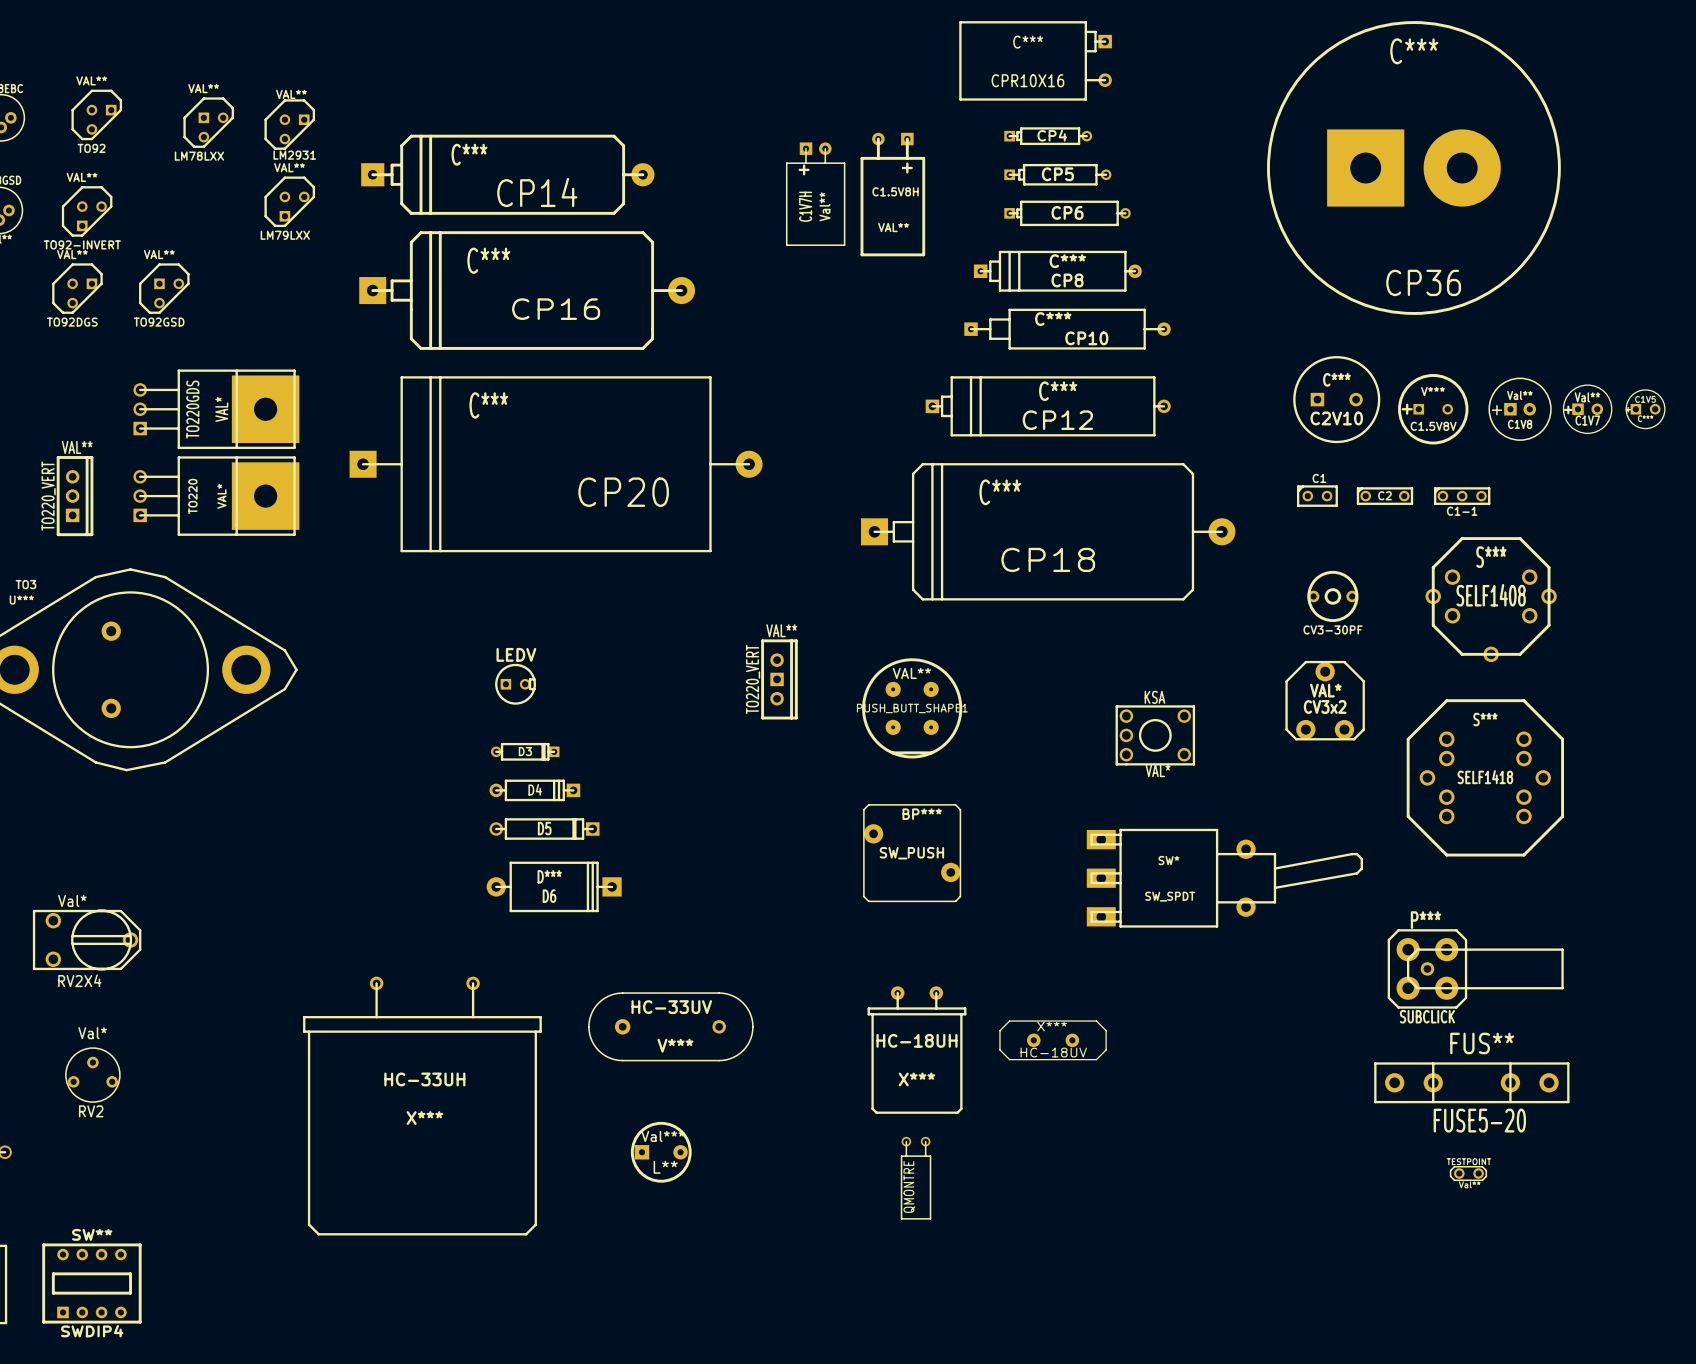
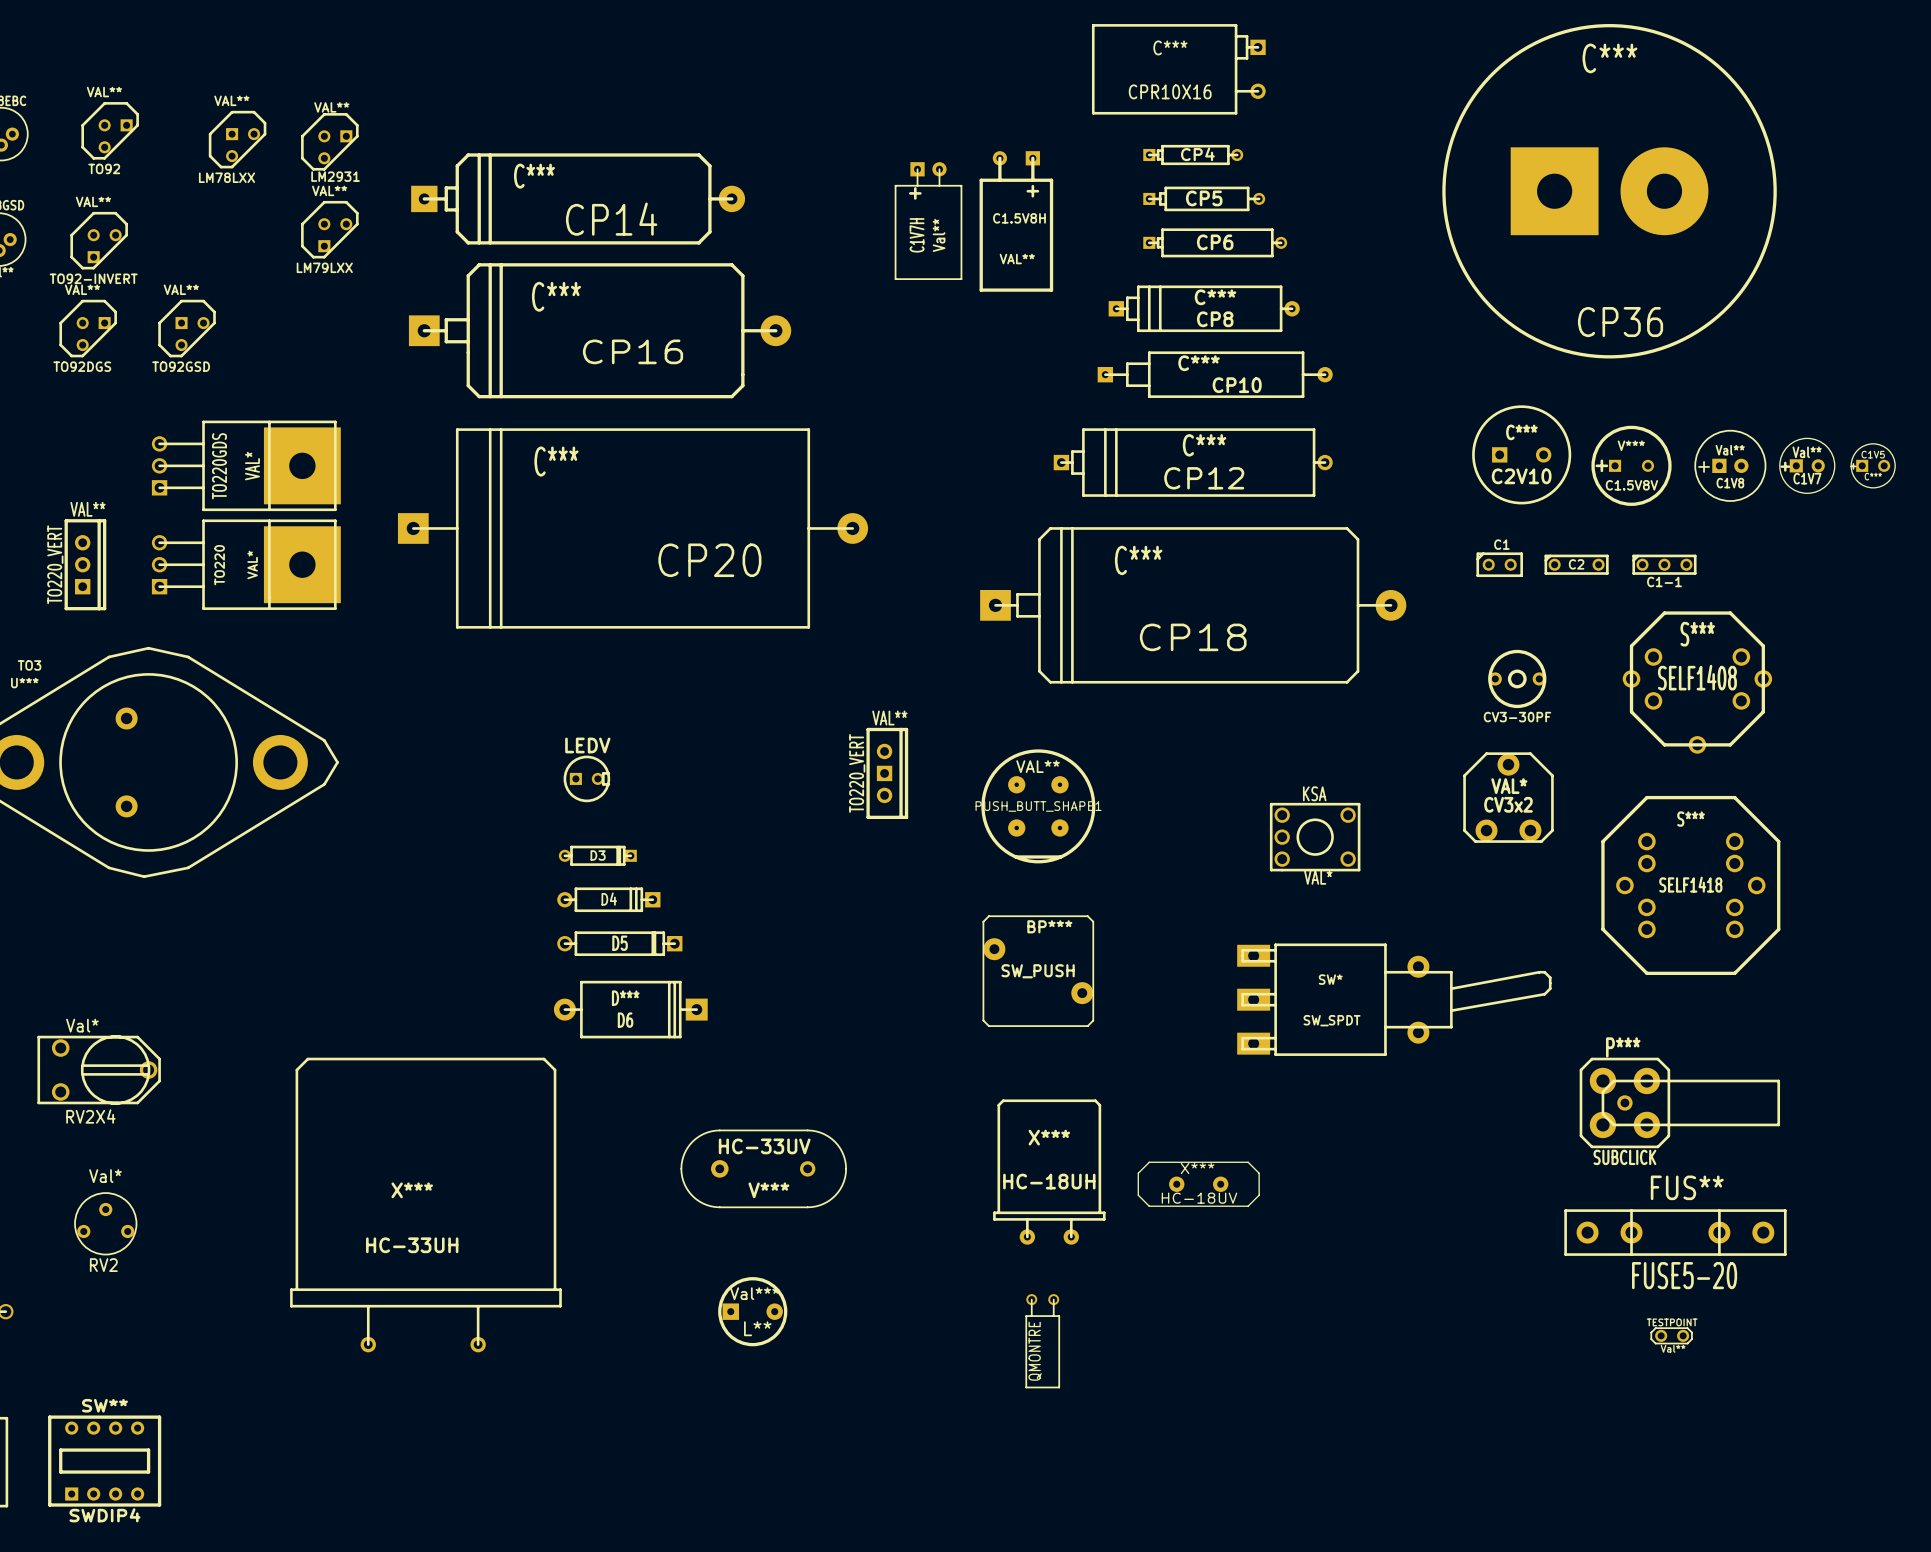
HC-33UV footprint: [588, 992, 754, 1062] -> [680, 1129, 847, 1209]
HC-18UH rotation: 0° (916, 1050) -> 180° (1049, 1172)
HC-33UH rotation: 0° (422, 1106) -> 180° (425, 1205)

